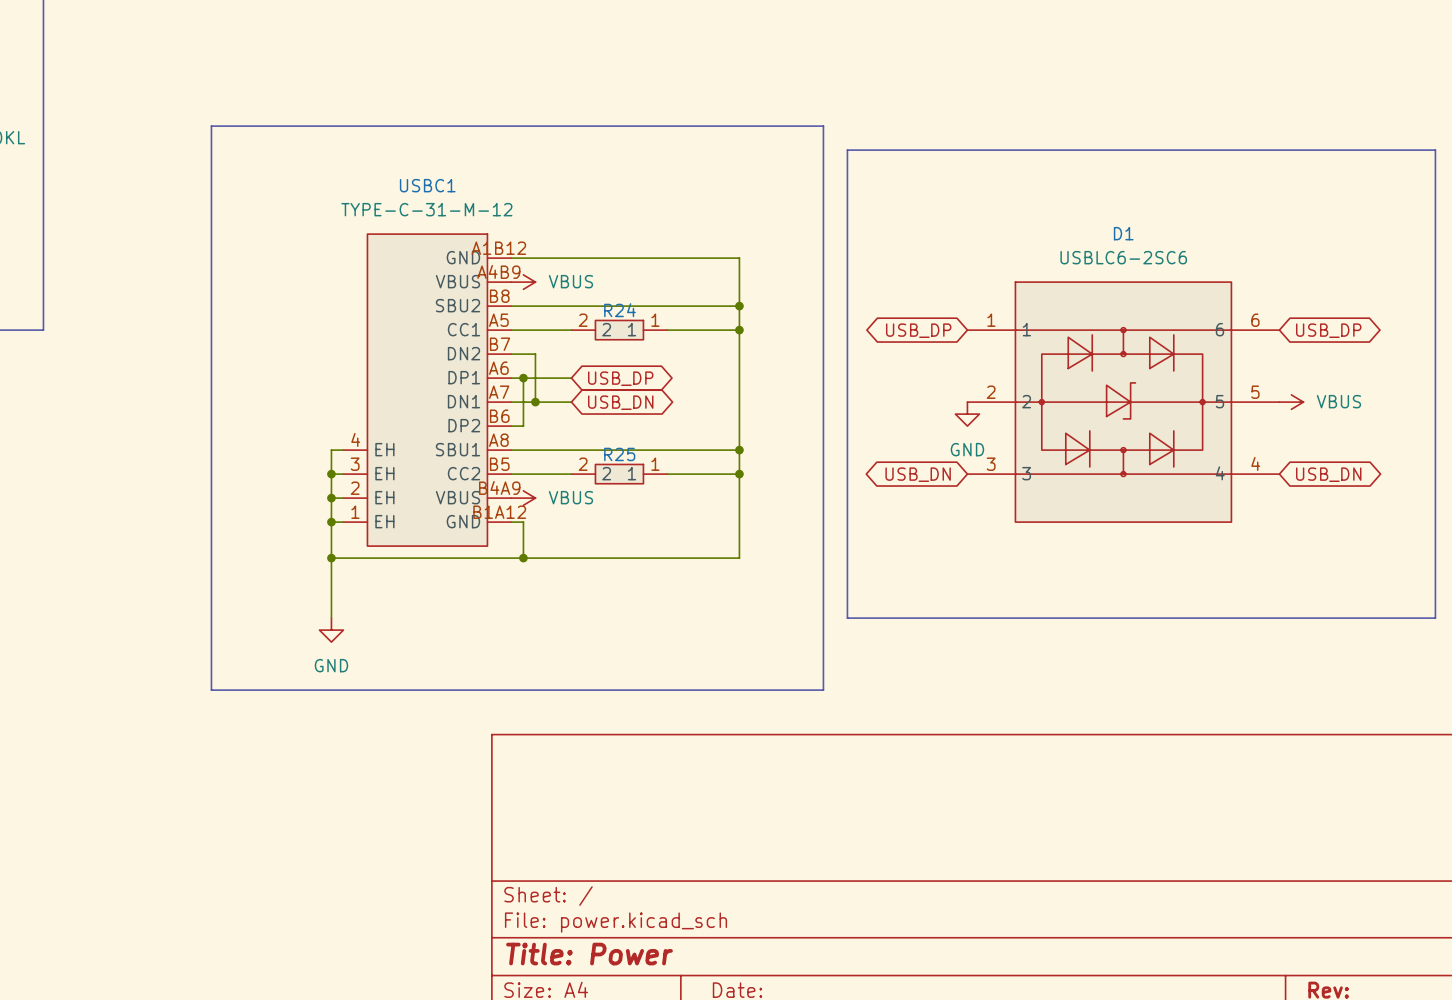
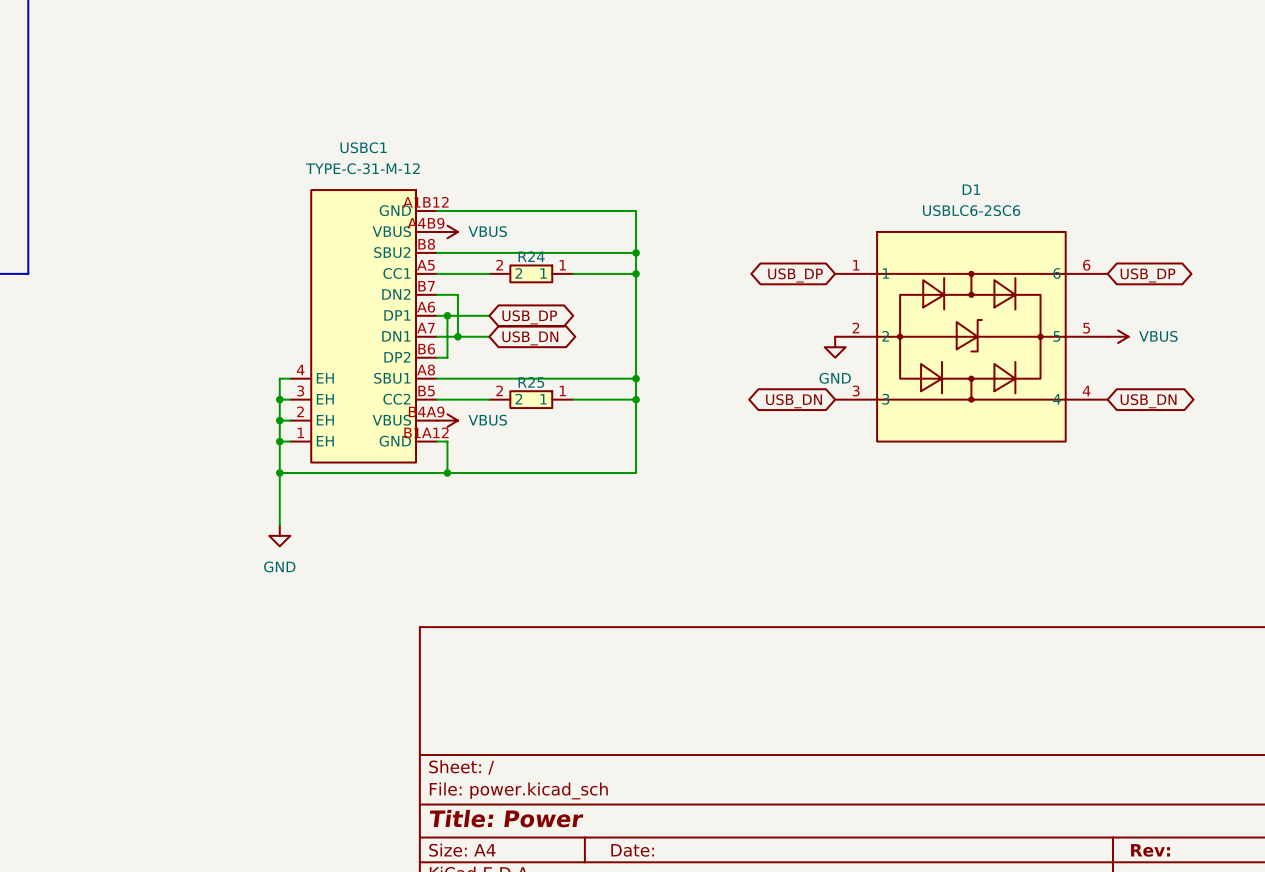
line: (211, 126) (823, 126) (823, 690) (211, 690) (211, 126) -> none
line: (847, 150) (1435, 150) (1435, 618) (847, 618) (847, 150) -> none

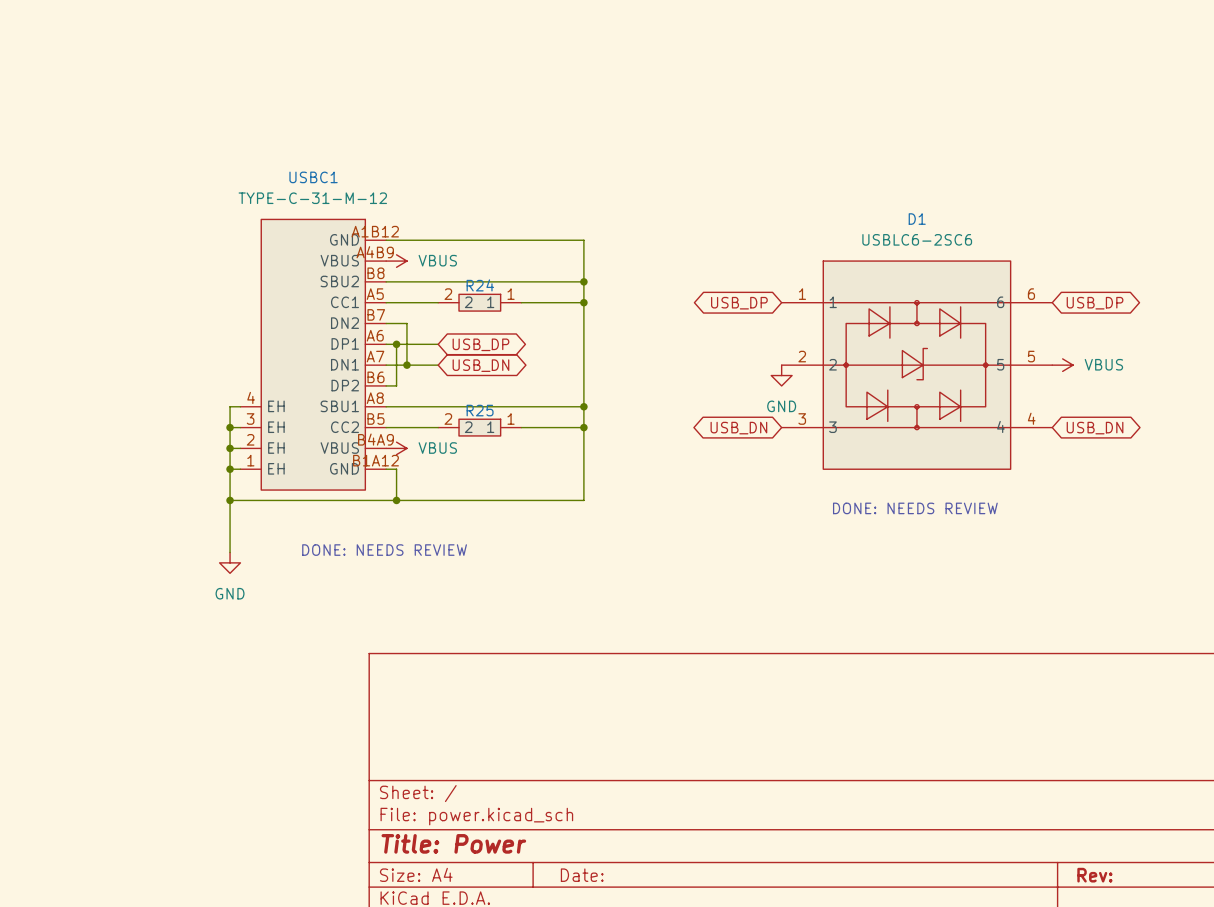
text: none -> DONE: NEEDS REVIEW (915, 508)
text: none -> DONE: NEEDS REVIEW (384, 550)

